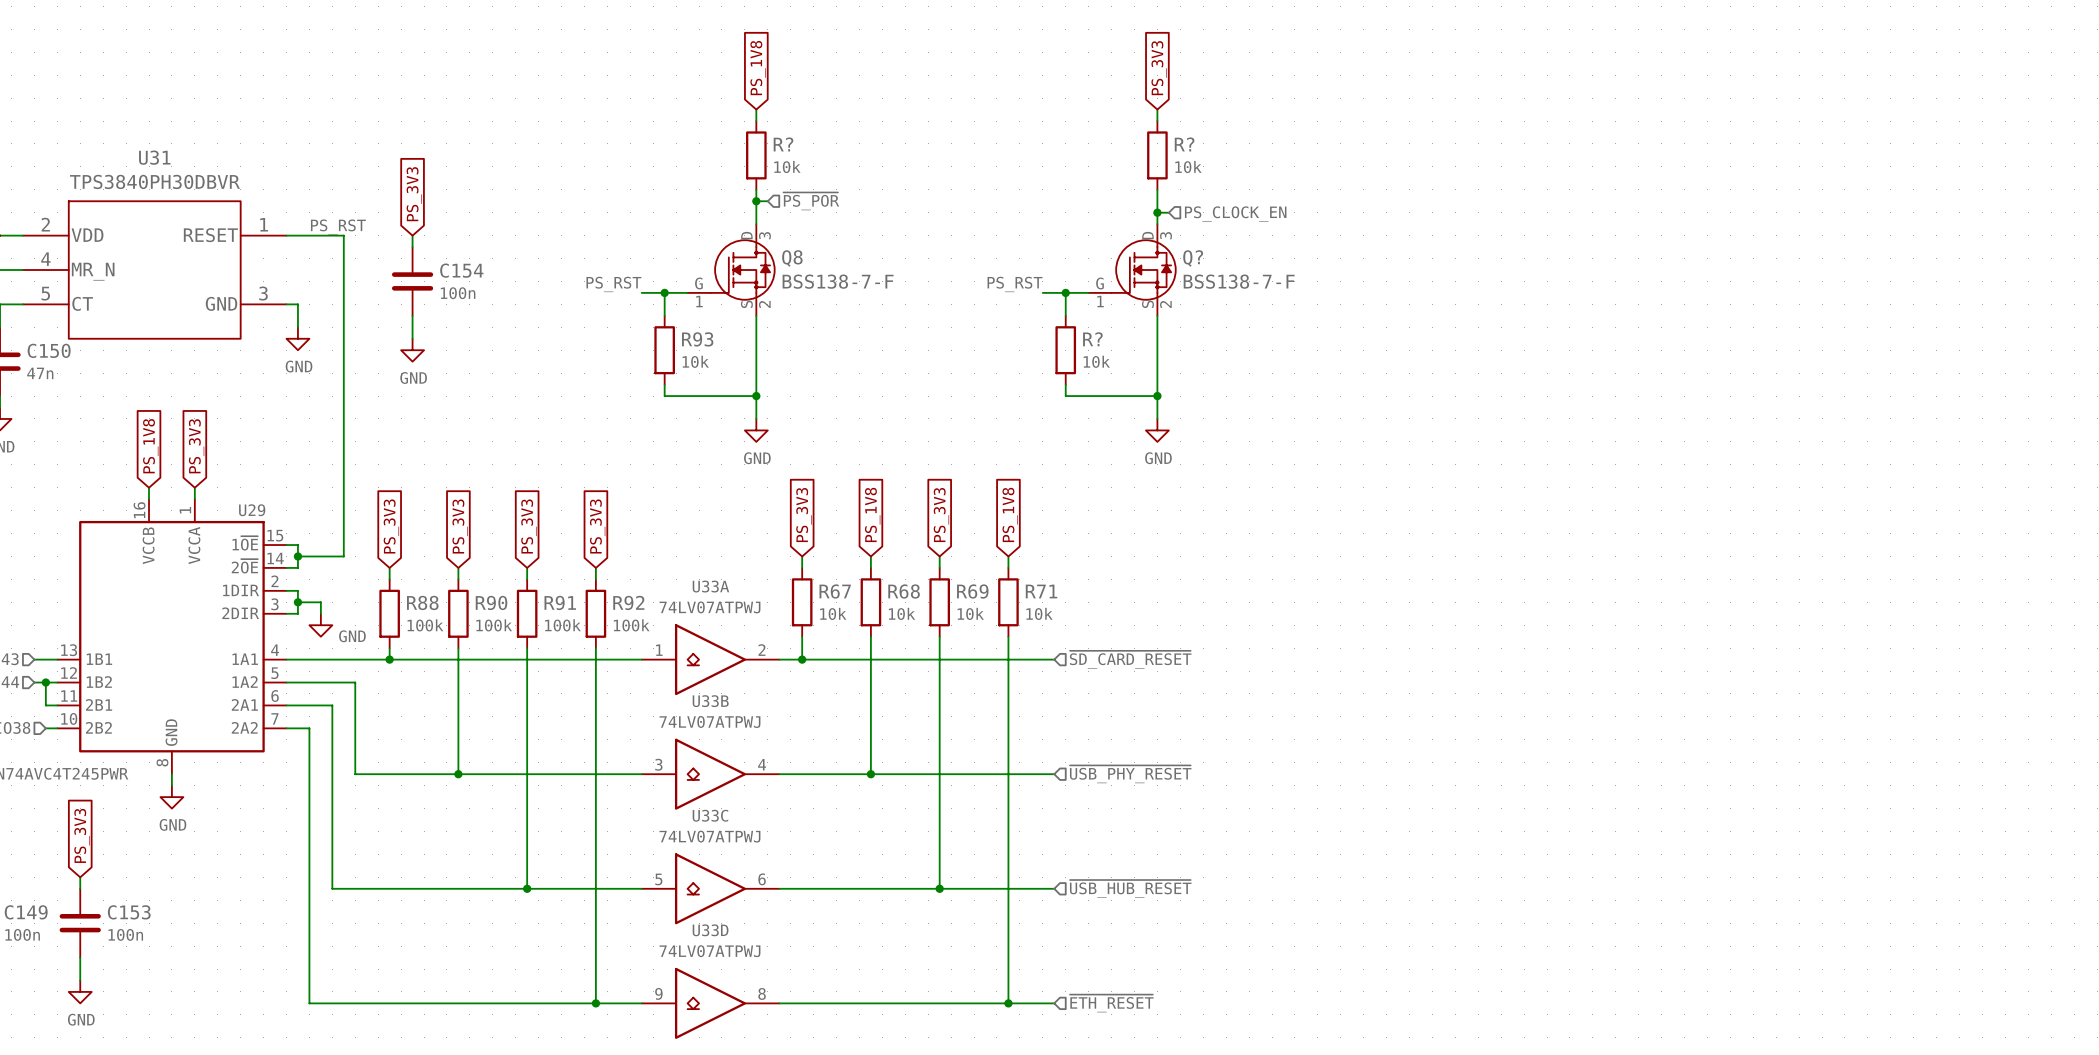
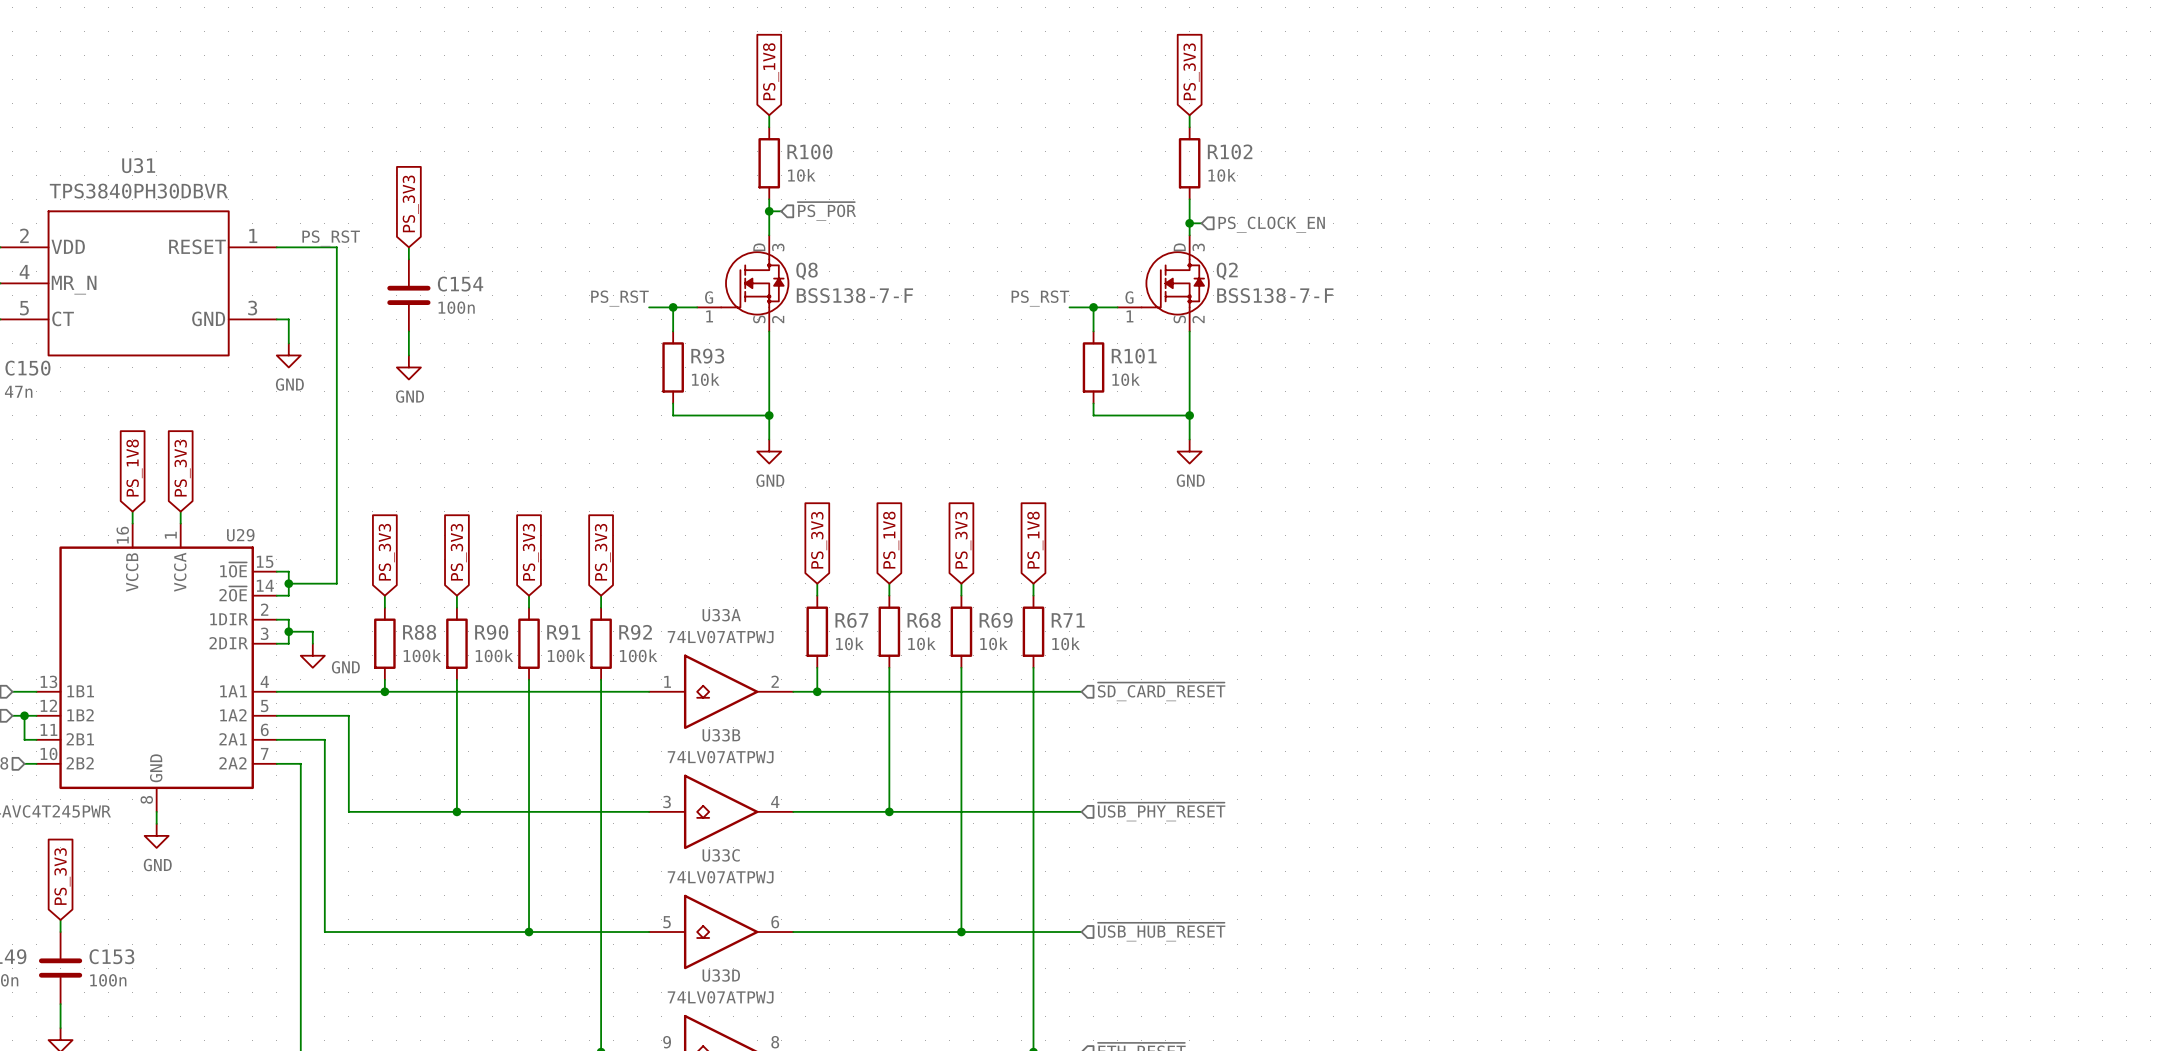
R? name: R? (783, 144) -> R100 (809, 151)
R? name: R? (1184, 144) -> R102 (1230, 151)
Q? name: Q? (1193, 258) -> Q2 (1227, 271)
R? name: R? (1092, 339) -> R101 (1134, 356)

